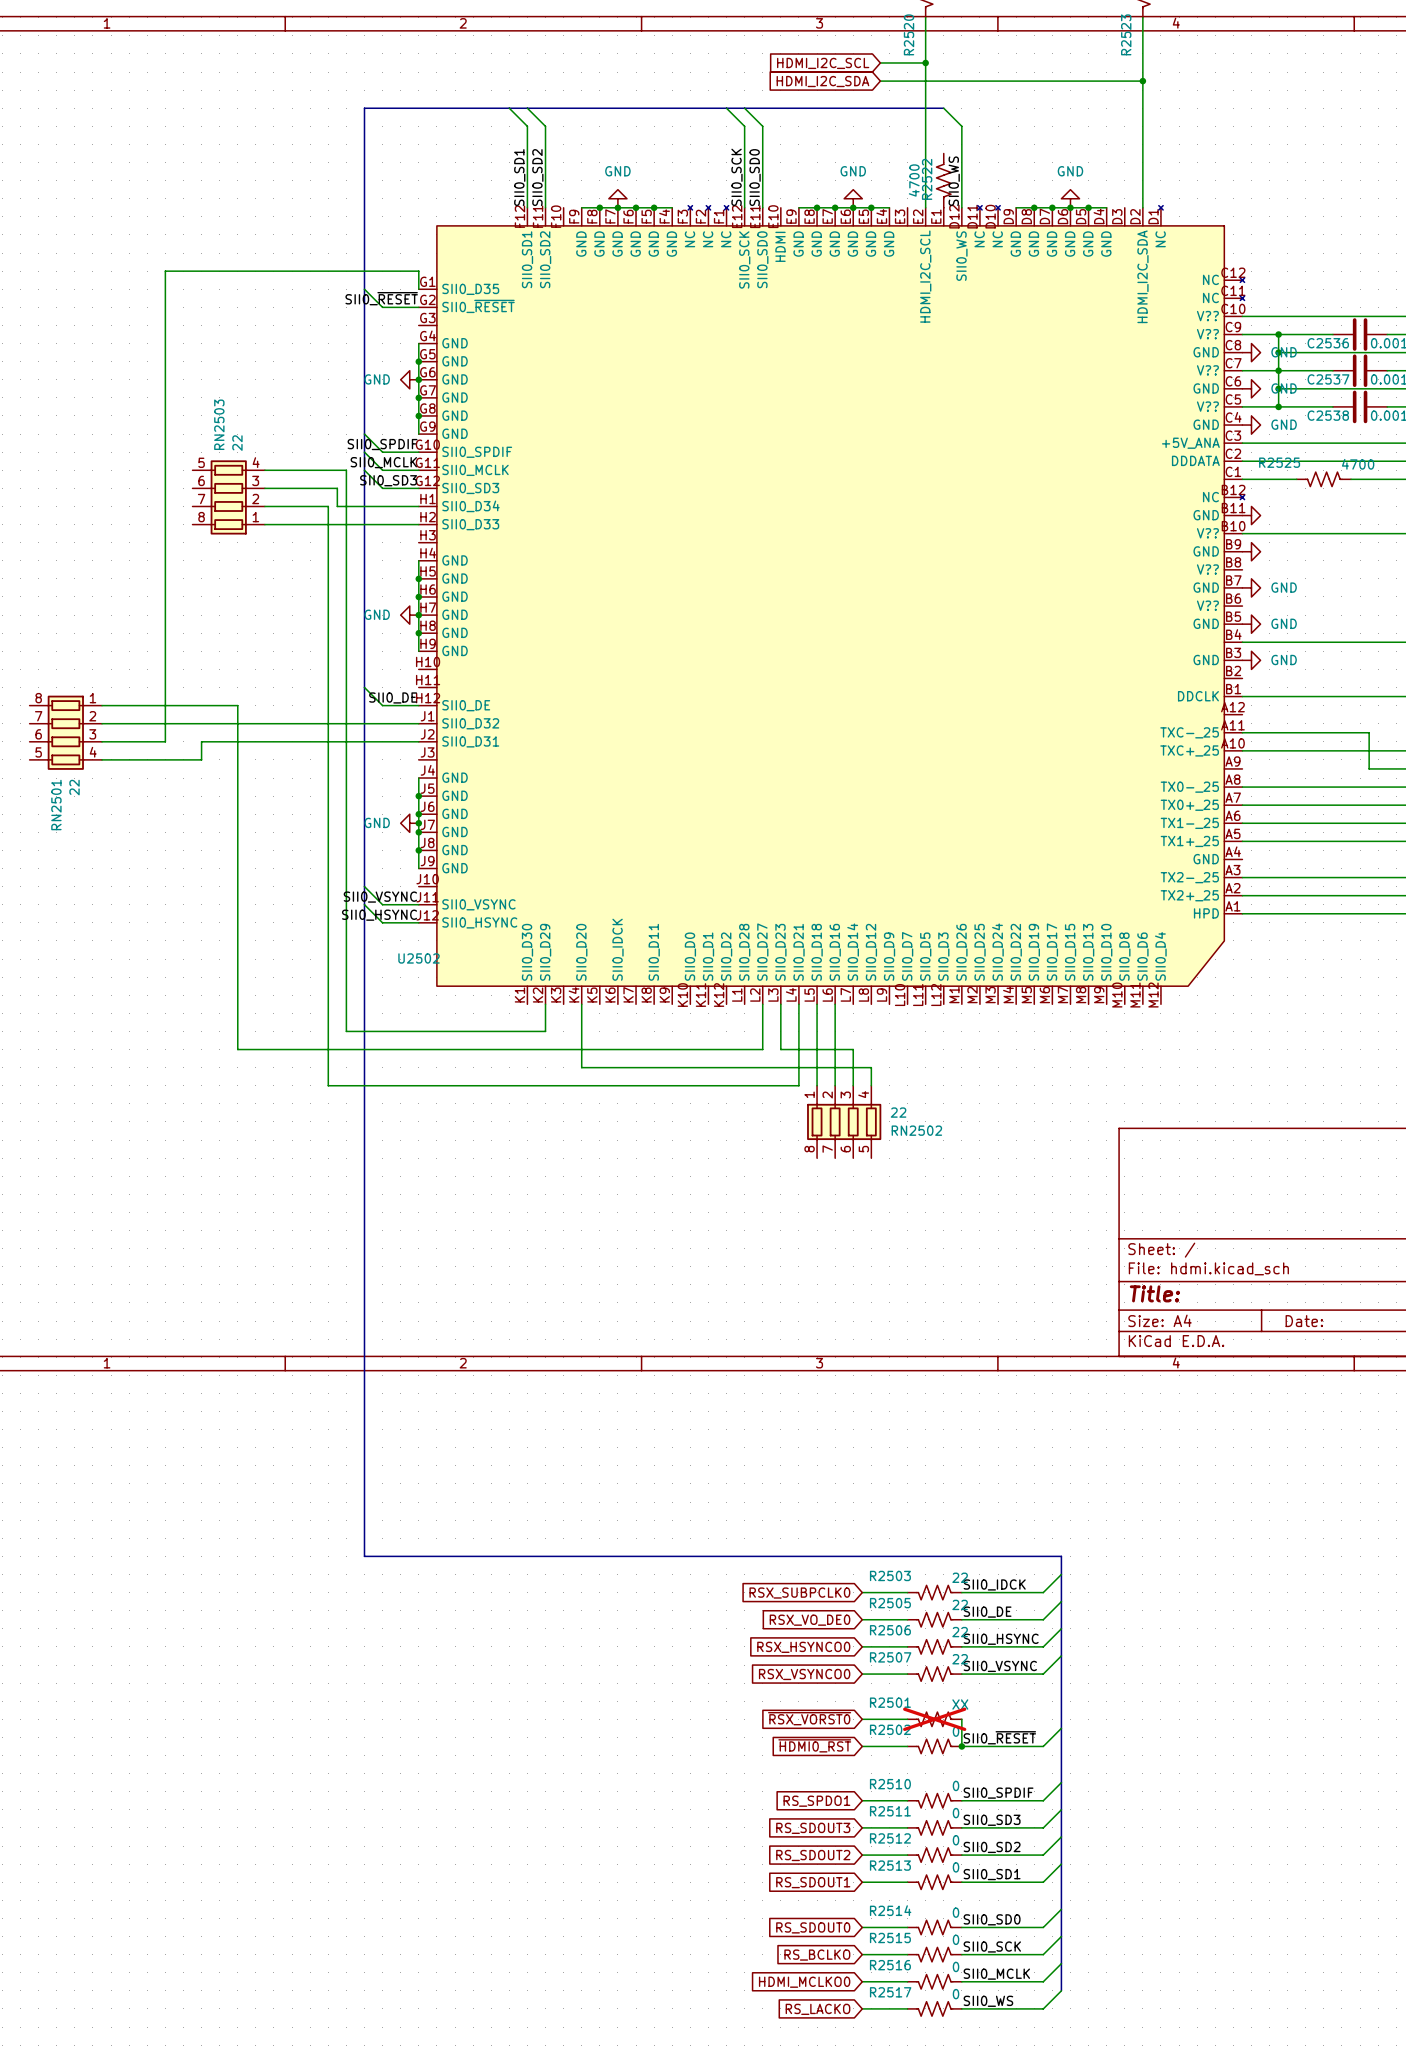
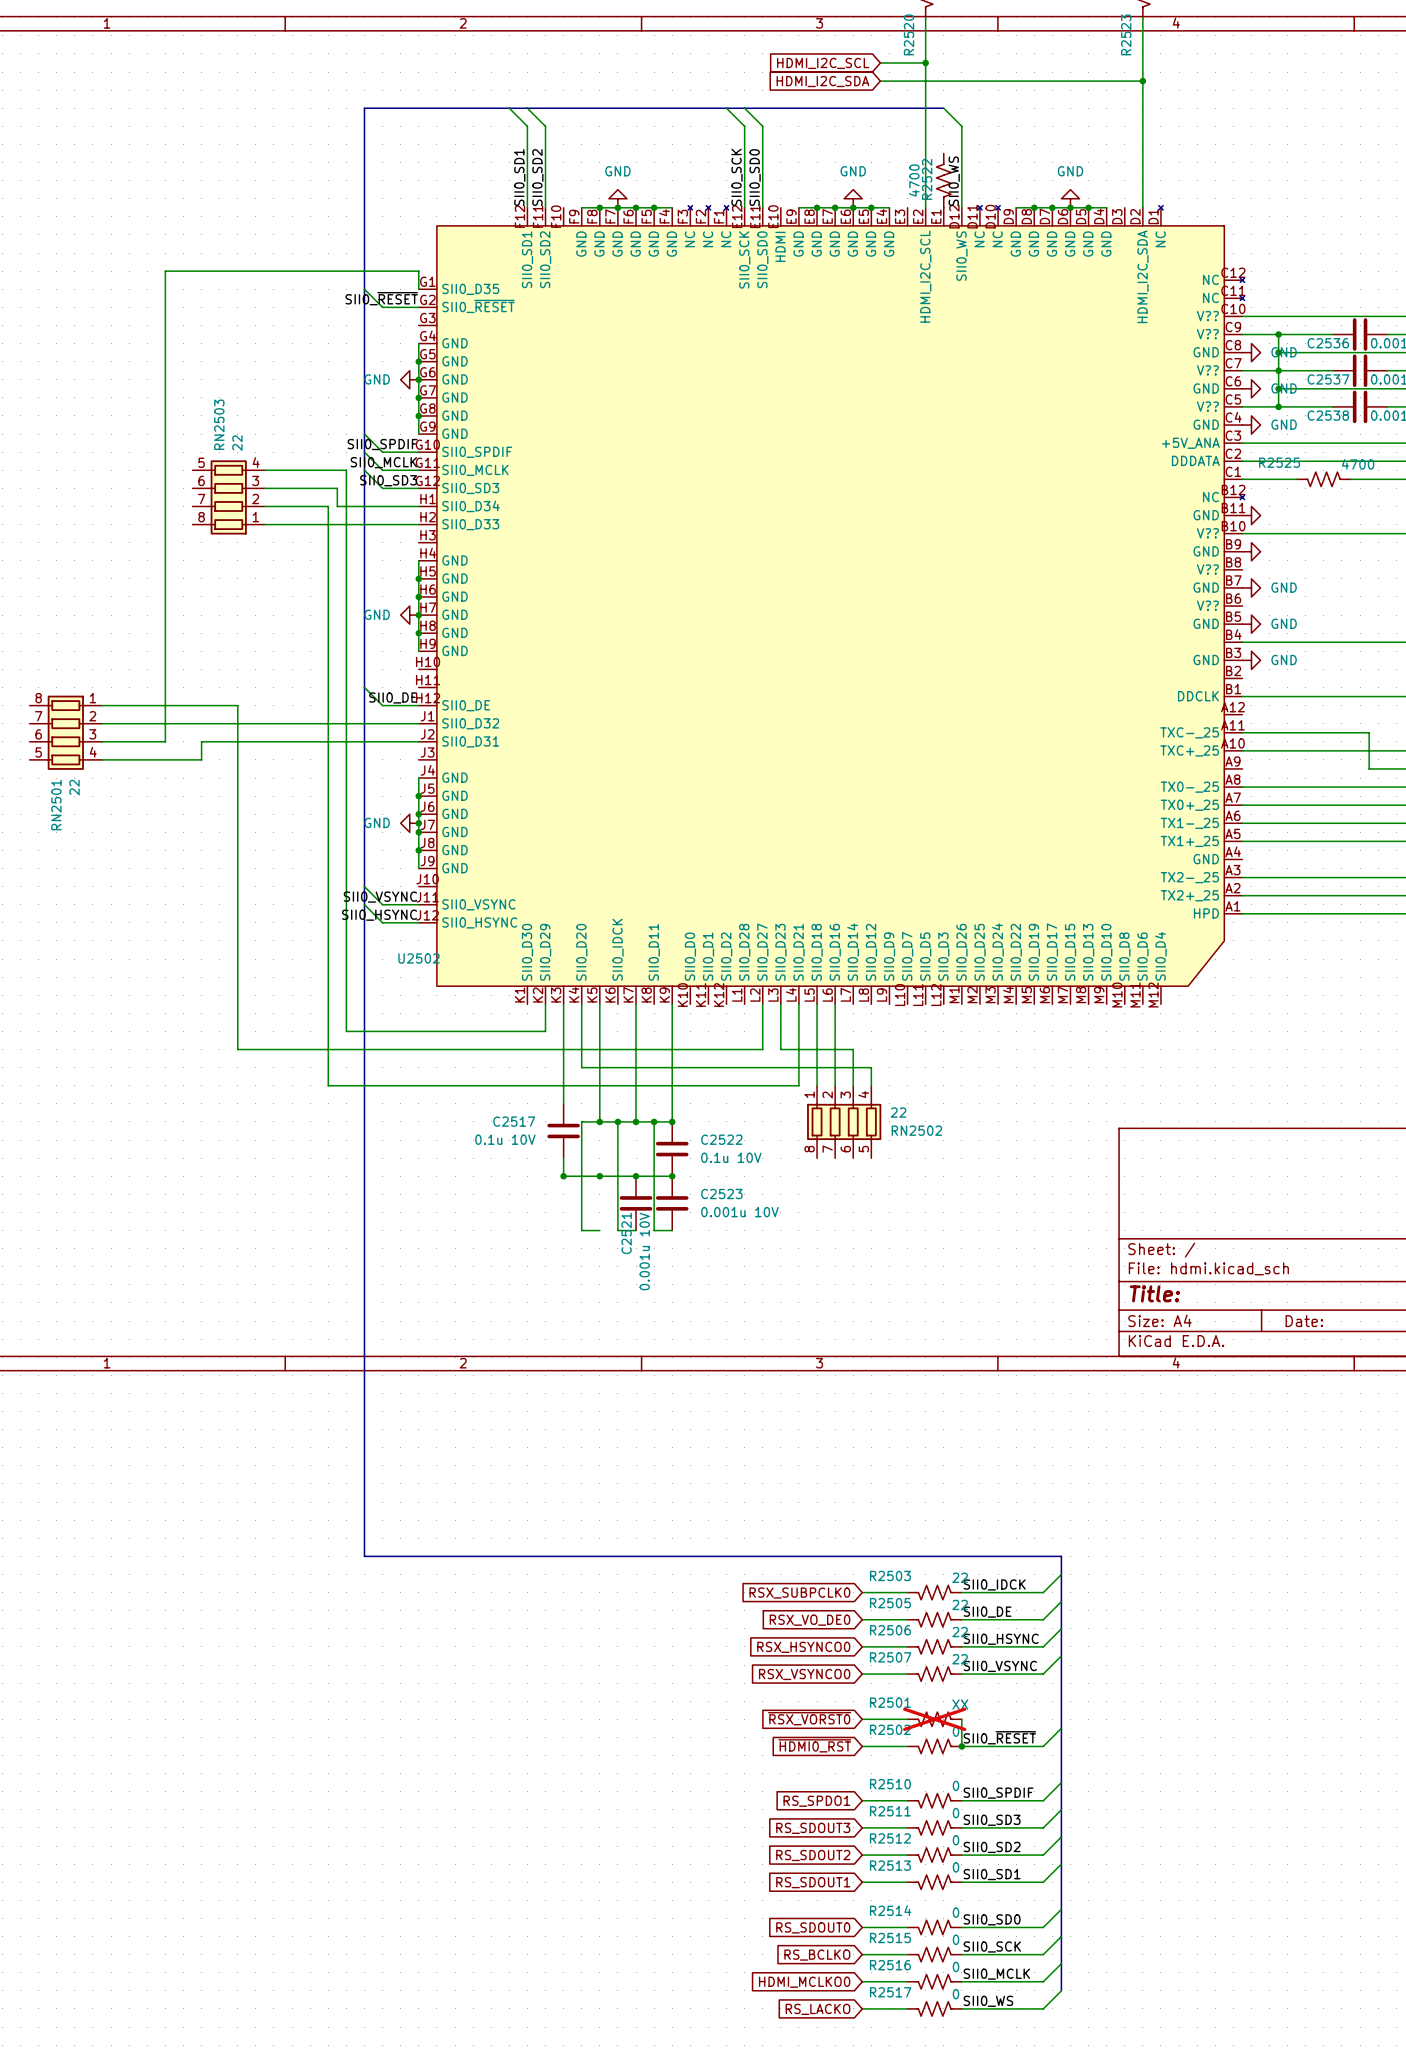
wire: none -> (563, 1004) (563, 1103)
wire: none -> (599, 1004) (599, 1121)
wire: none -> (636, 1004) (636, 1121)
wire: none -> (672, 1004) (672, 1121) (581, 1121) (581, 1230) (599, 1230)
junction: none -> (599, 1121)
wire: none -> (617, 1121) (617, 1230) (636, 1230)
junction: none -> (617, 1121)
junction: none -> (636, 1121)
wire: none -> (654, 1121) (654, 1230) (672, 1230)
junction: none -> (654, 1121)
junction: none -> (672, 1121)
C2517: none -> 0.1u 10V (563, 1130)
C2522: none -> 0.1u 10V (672, 1149)
wire: none -> (563, 1158) (563, 1176) (672, 1176)
junction: none -> (563, 1176)
junction: none -> (599, 1176)
junction: none -> (636, 1176)
junction: none -> (672, 1176)
C2521: none -> 0.001u 10V (636, 1203)
C2523: none -> 0.001u 10V (672, 1203)

